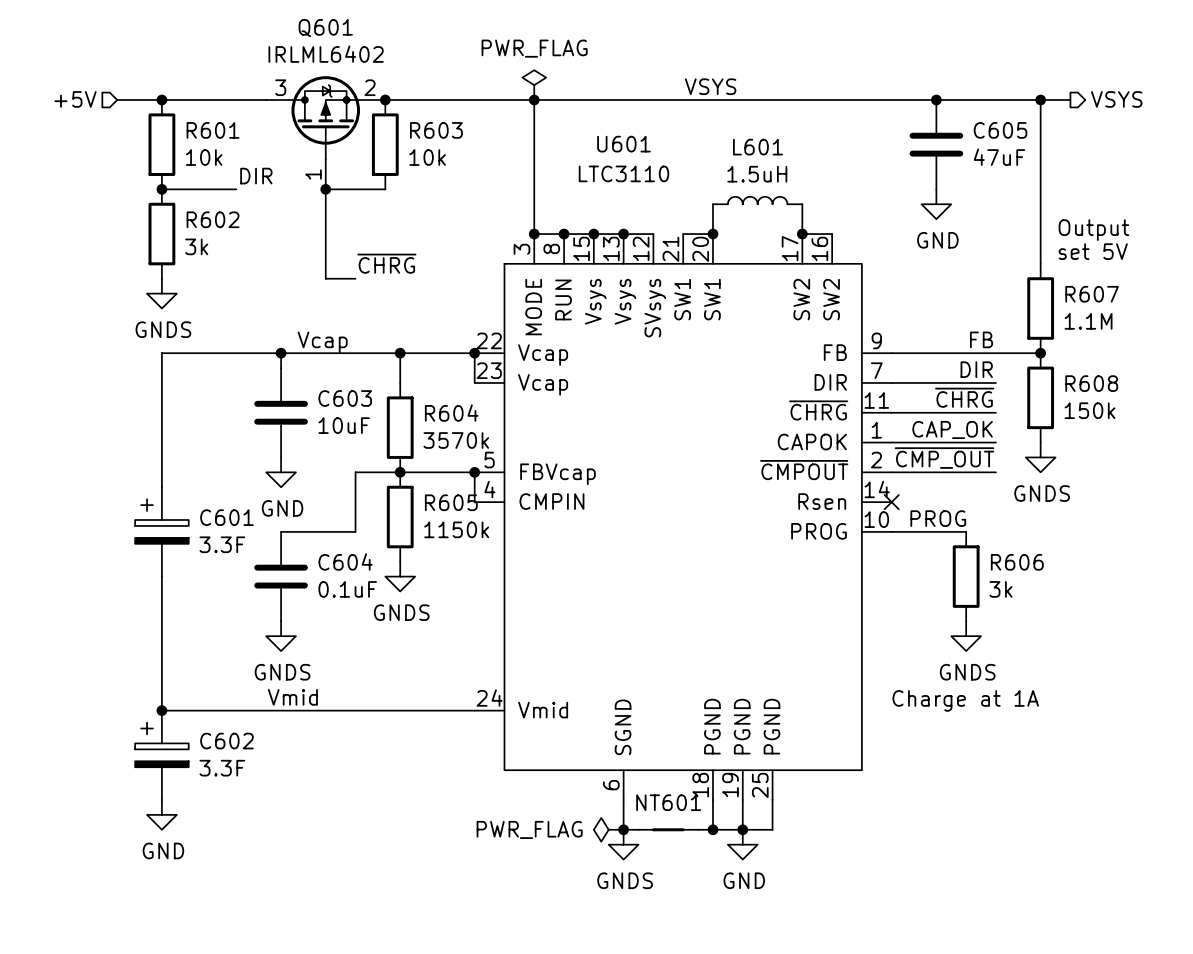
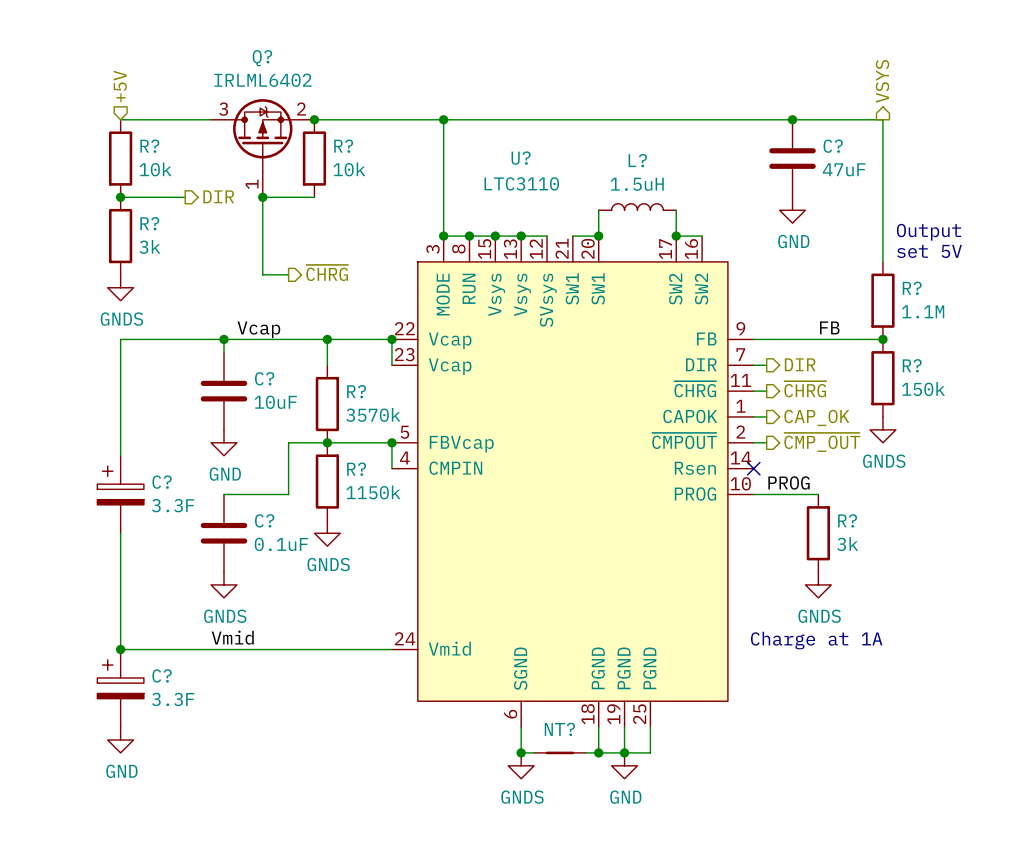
Q601 name: Q601 (325, 28) -> Q? (262, 58)
power symbol: PWR_FLAG (534, 85) -> none
label: VSYS (710, 86) -> none
hierarchical label rotation: 0° (75, 99) -> 90° clockwise (120, 86)
hierarchical label position: +5V (75, 99) -> +5V (120, 86)
hierarchical label rotation: 0° (1116, 99) -> 90° counterclockwise (882, 81)
hierarchical label position: VSYS (1116, 99) -> VSYS (882, 81)
wire: (117, 100) (161, 100) -> none
junction: (161, 100) -> none
wire: (1040, 100) (1070, 100) -> none
junction: (1040, 100) -> none
R601 name: R601 (213, 130) -> R? (149, 146)
R603 name: R603 (436, 130) -> R? (343, 146)
C605 name: C605 (1000, 130) -> C? (833, 146)
U601 name: U601 (623, 144) -> U? (521, 158)
L601 name: L601 (758, 147) -> L? (637, 160)
label: DIR (256, 176) -> none
hierarchical label: none -> DIR (218, 196)
R602 name: R602 (213, 219) -> R? (149, 223)
label: ~{CHRG} (386, 263) -> none
hierarchical label: none -> ~{CHRG} (327, 272)
R607 name: R607 (1092, 294) -> R? (912, 288)
label: DIR (976, 369) -> none
wire: (906, 382) (995, 382) -> none
hierarchical label: none -> DIR (800, 364)
R608 name: R608 (1091, 383) -> R? (912, 365)
label: ~{CHRG} (964, 397) -> none
C603 name: C603 (345, 398) -> C? (264, 378)
hierarchical label: none -> ~{CHRG} (805, 389)
wire: (906, 412) (995, 412) -> none
R604 name: R604 (451, 413) -> R? (356, 391)
label: CAP_OK (952, 429) -> none
wire: (906, 442) (995, 442) -> none
hierarchical label: none -> CAP_OK (816, 417)
label: ~{CMP_OUT} (944, 458) -> none
hierarchical label: none -> ~{CMP_OUT} (822, 442)
wire: (906, 472) (995, 472) -> none
R605 name: R605 (451, 502) -> R? (356, 469)
C601 name: C601 (226, 517) -> C? (162, 482)
C604 name: C604 (345, 561) -> C? (264, 520)
R606 name: R606 (1017, 562) -> R? (847, 520)
C602 name: C602 (226, 741) -> C? (162, 675)
NT601 name: NT601 (668, 802) -> NT? (559, 729)
power symbol: PWR_FLAG (608, 829) -> none

